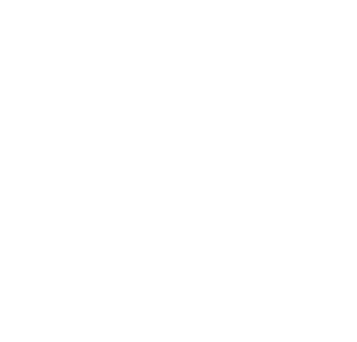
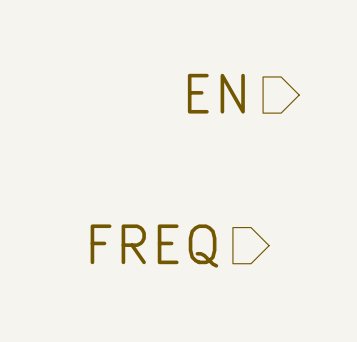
hierarchical label: none -> EN (216, 93)
hierarchical label: none -> FREQ (154, 246)

